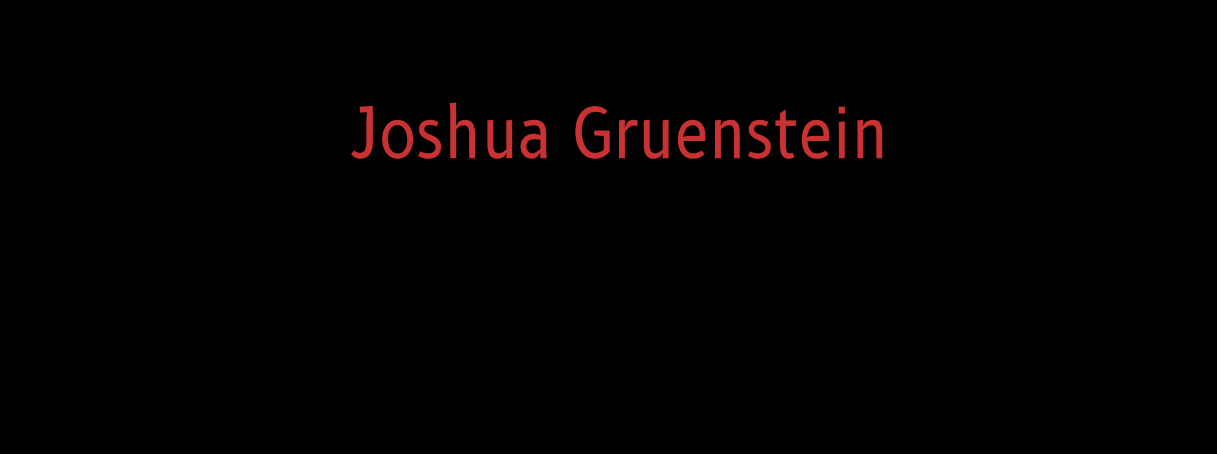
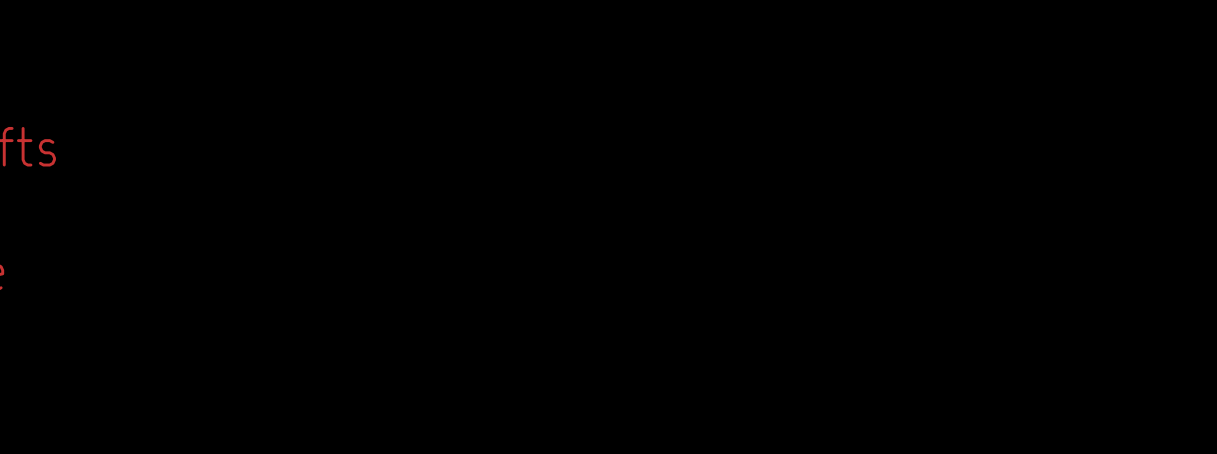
text: Joshua Gruenstein (616, 130) -> none

